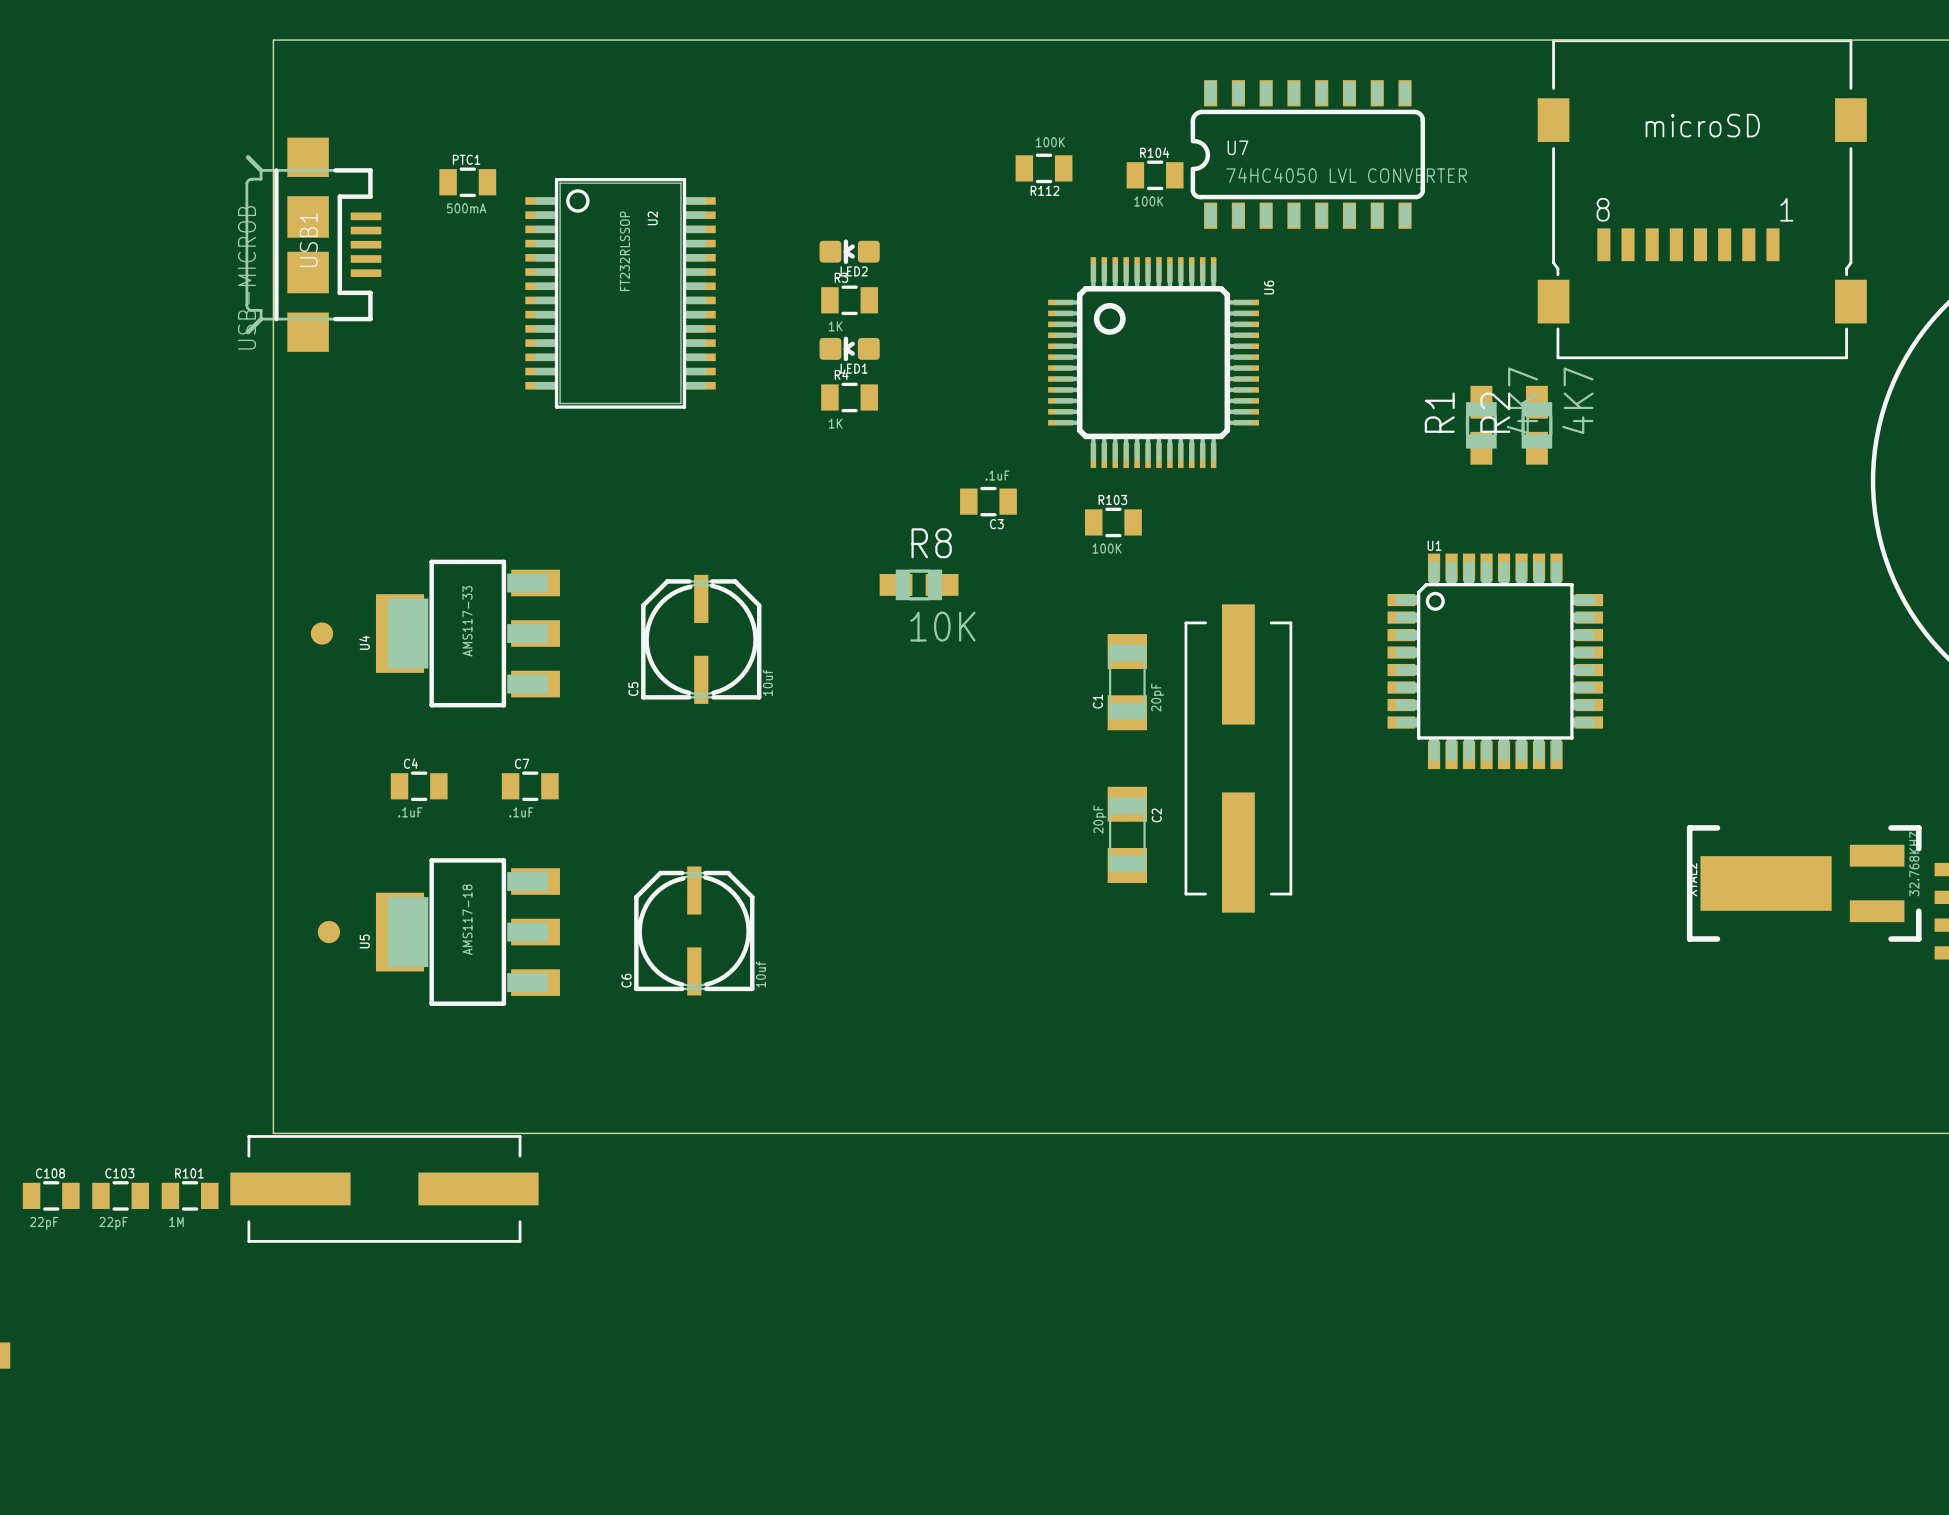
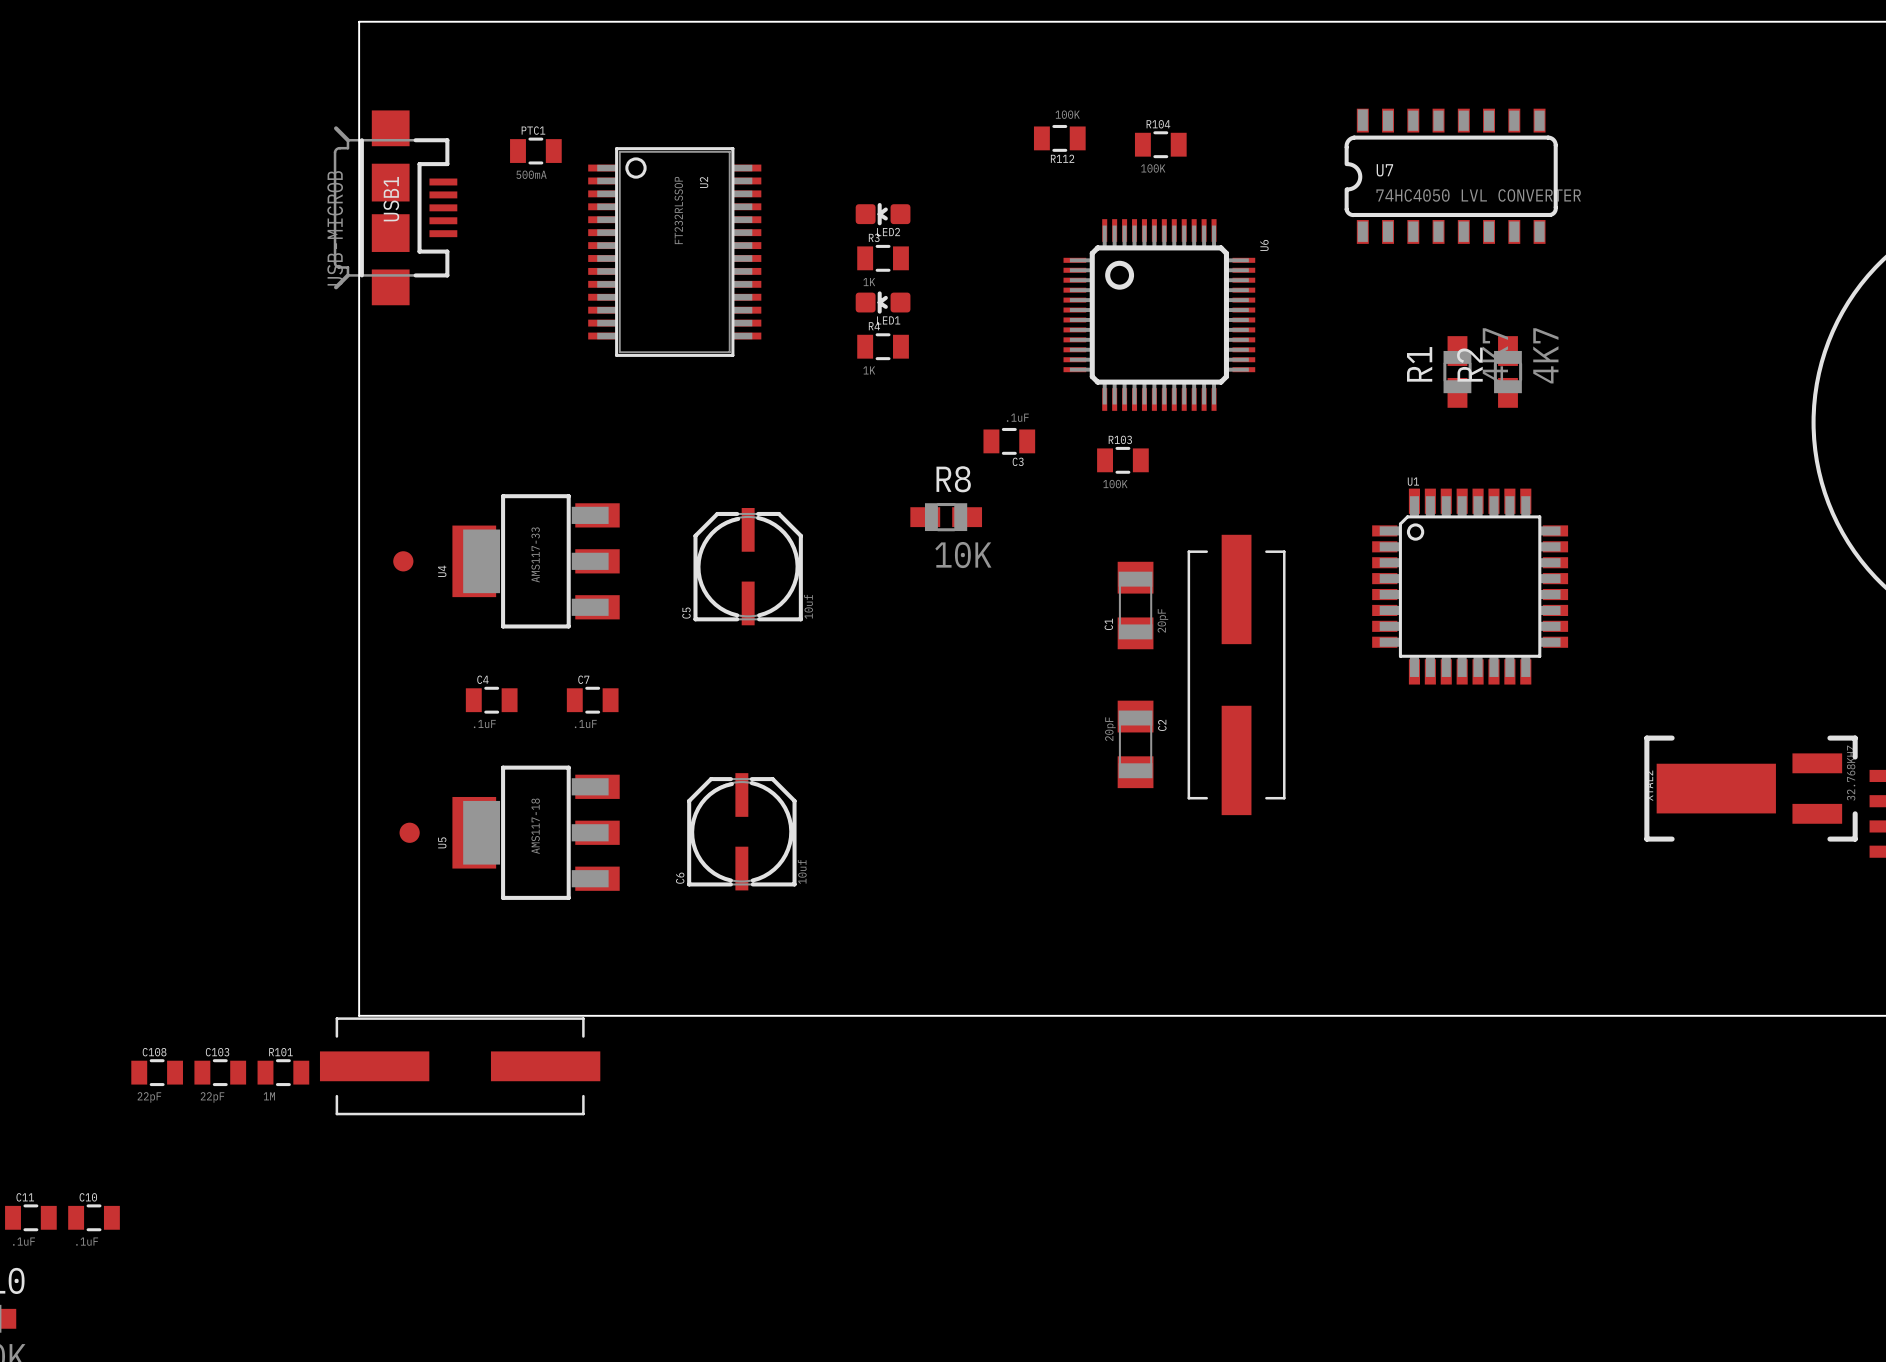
U7 position: (1307, 154) -> (1451, 176)
part: (1702, 199) -> none

